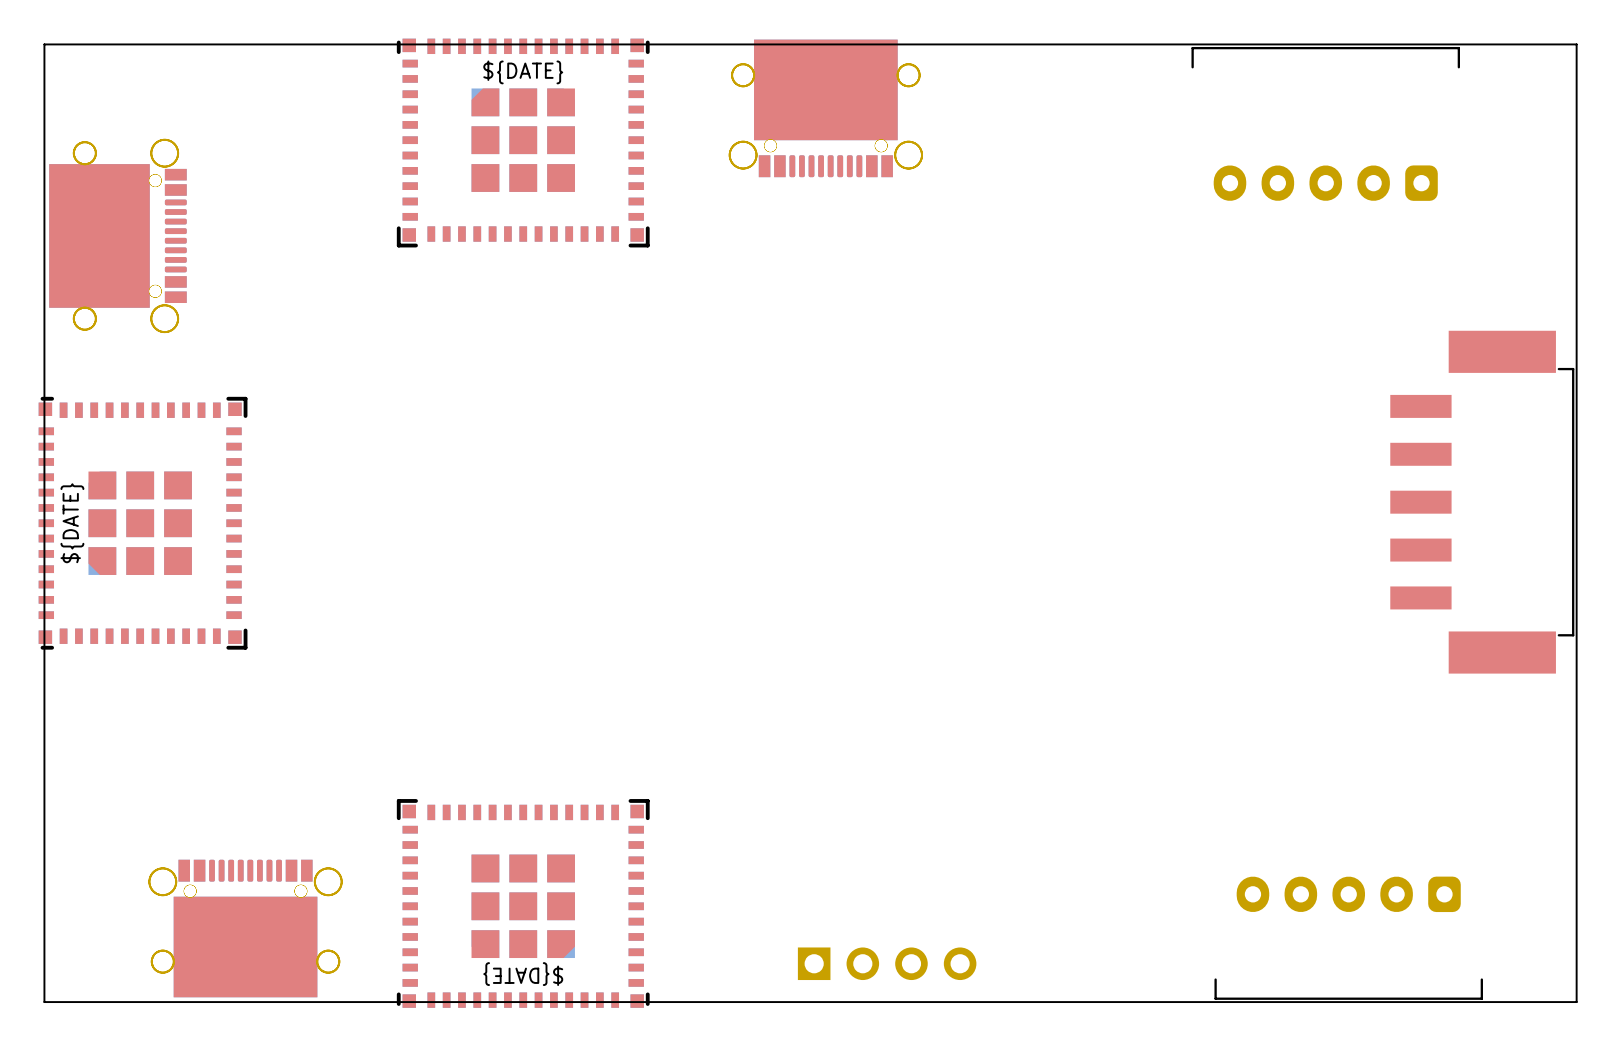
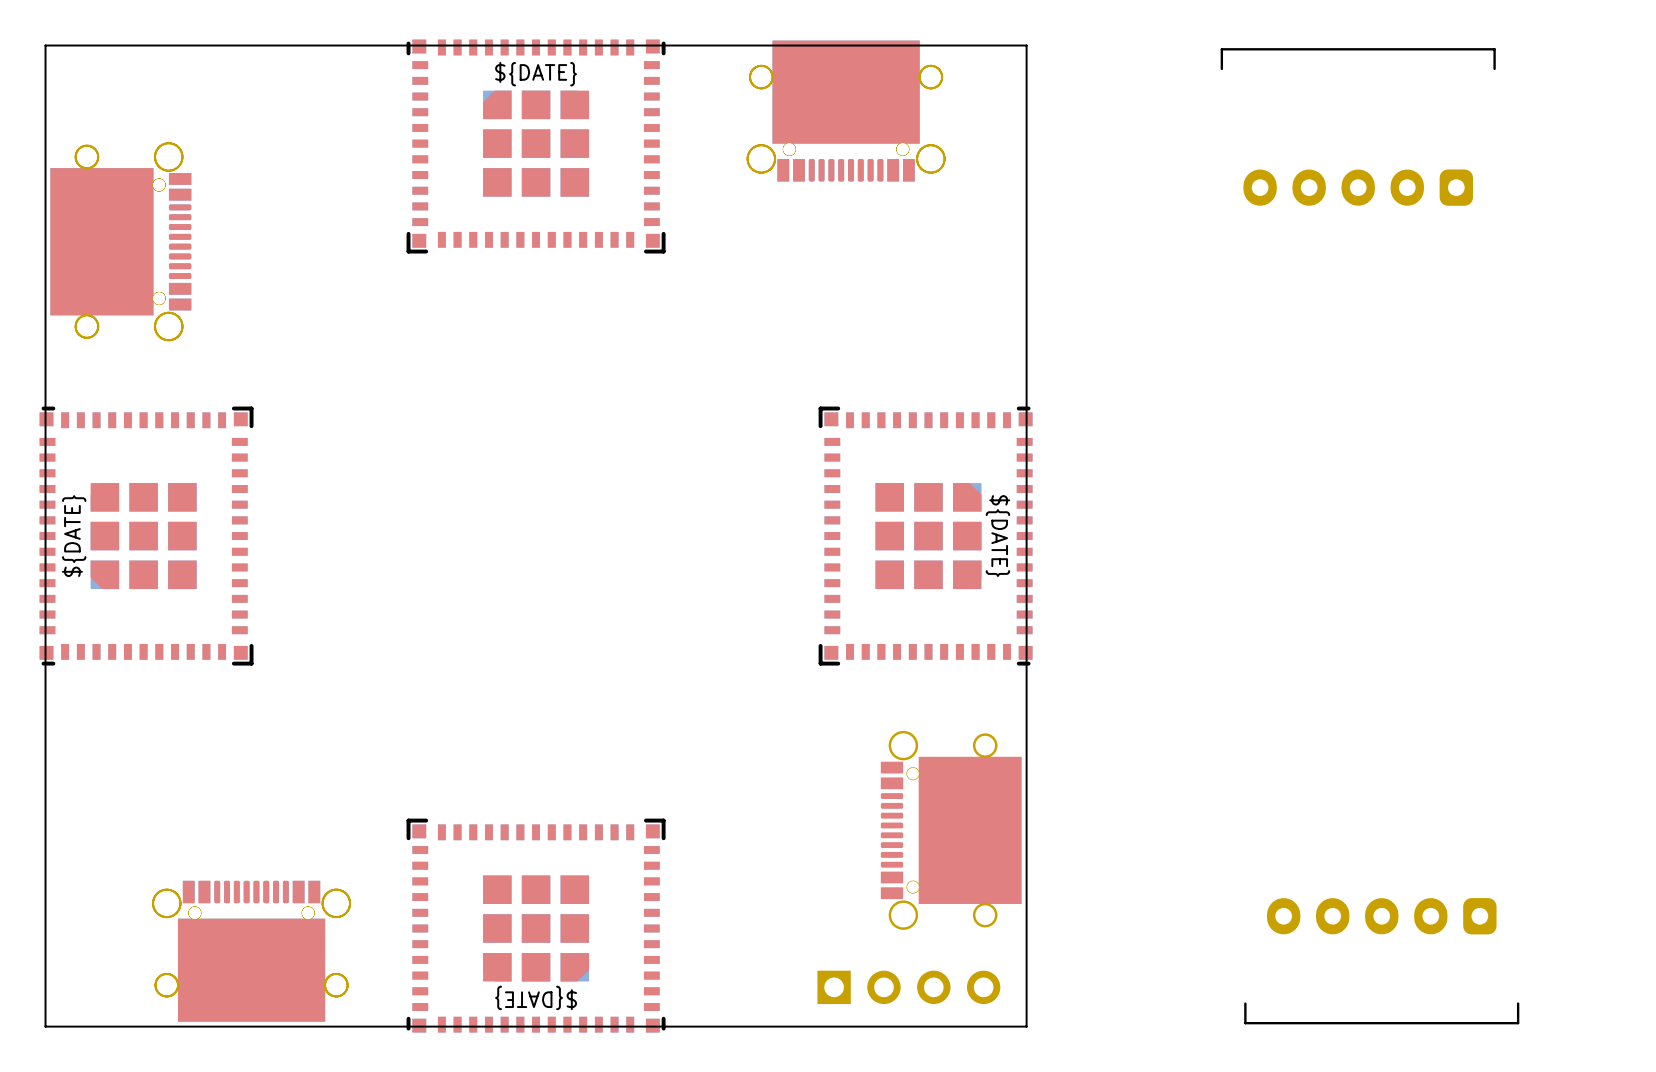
board edge: (1002, 44) (1576, 44) (1576, 1002) (1002, 1002) -> (1026, 45) (1026, 1026)
part: (1482, 502) -> none
part: none -> (925, 536)
part: none -> (951, 830)

